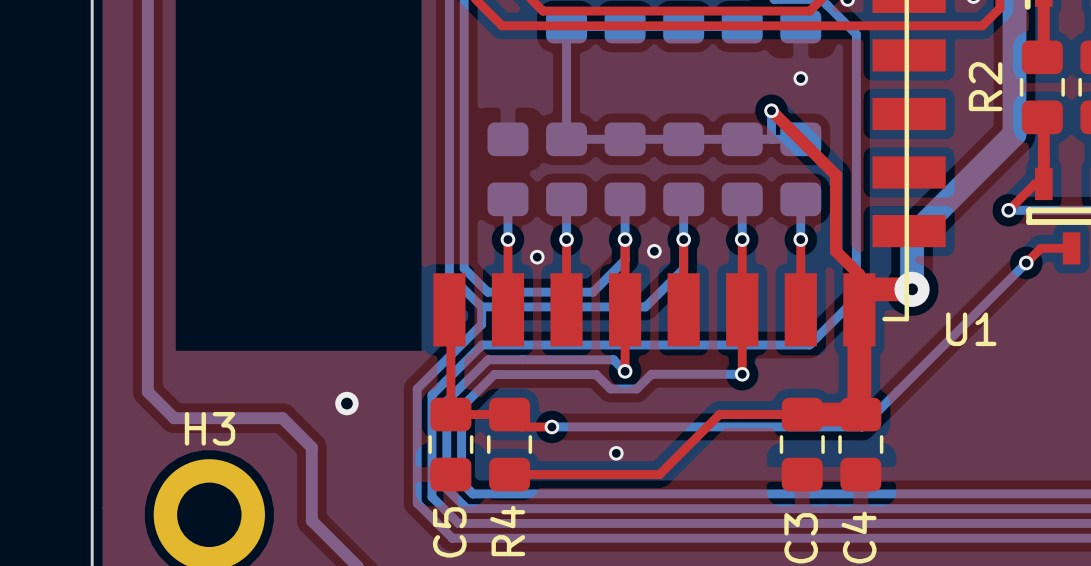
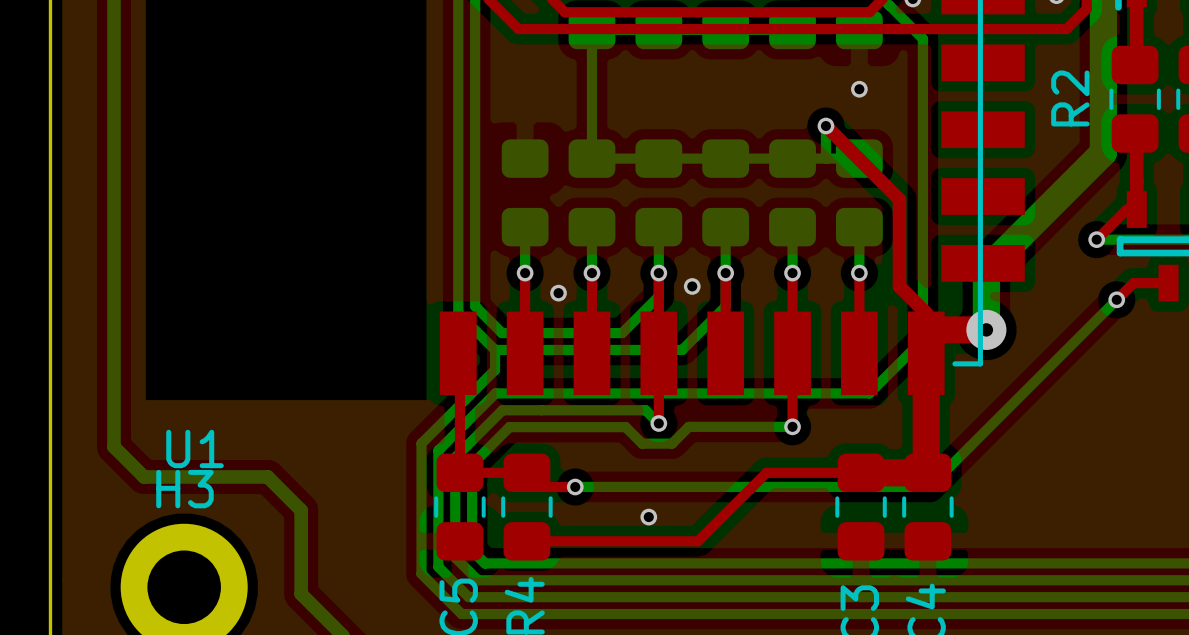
U1 name position: U1 (971, 329) -> U1 (195, 448)
via: (346, 403) -> none

